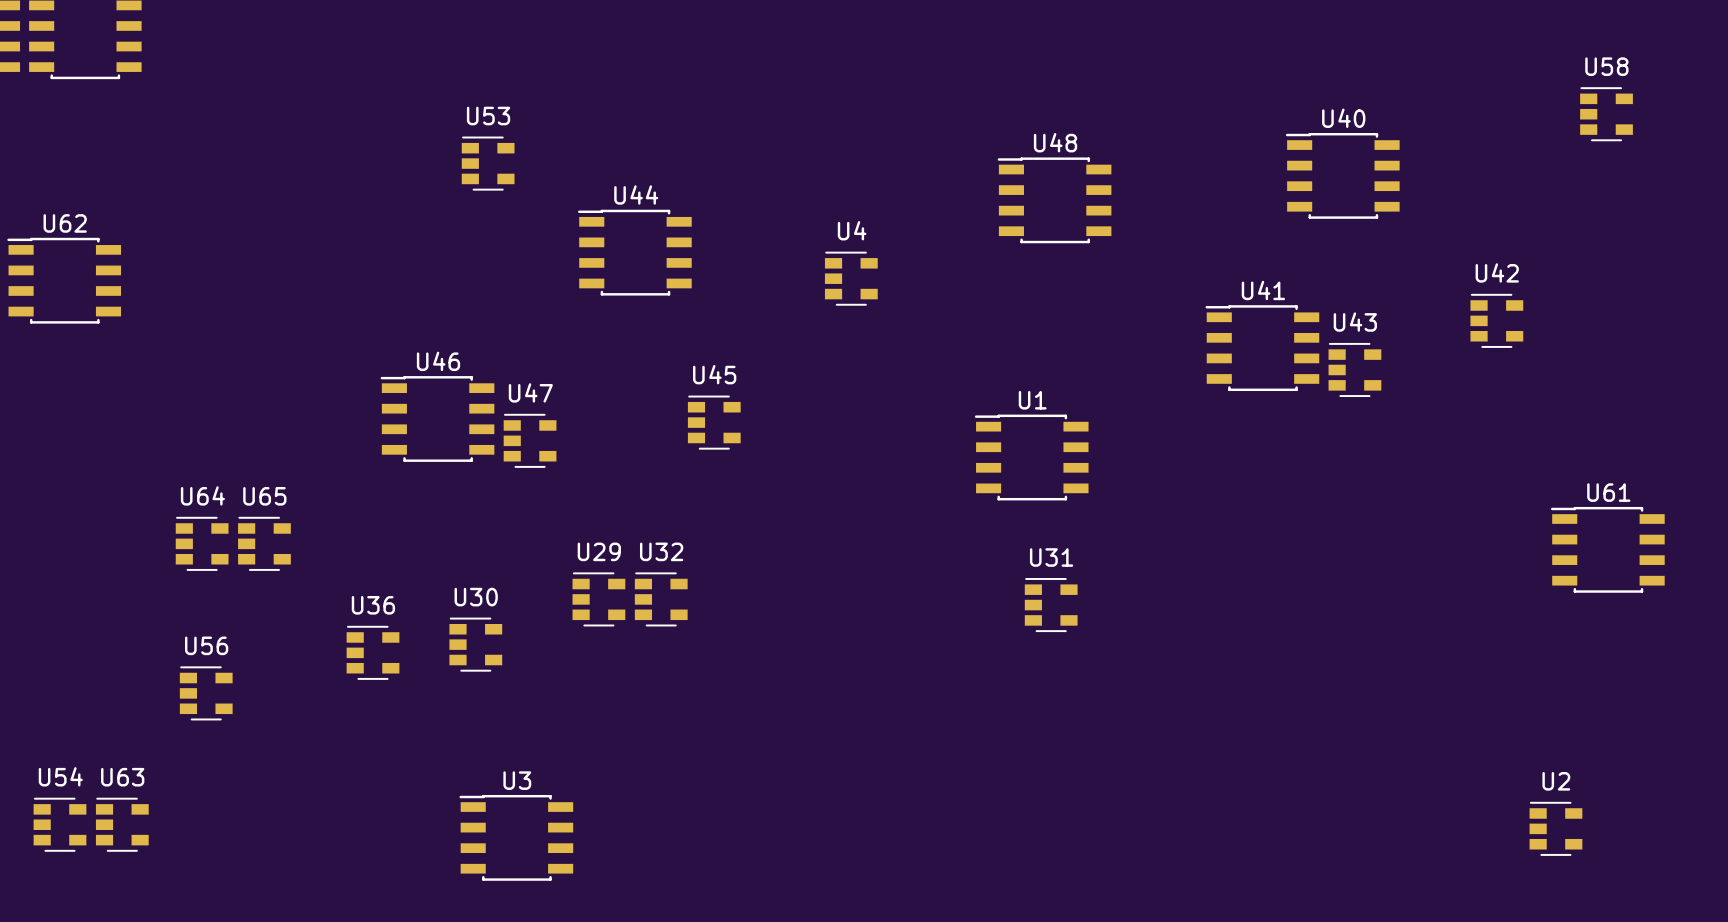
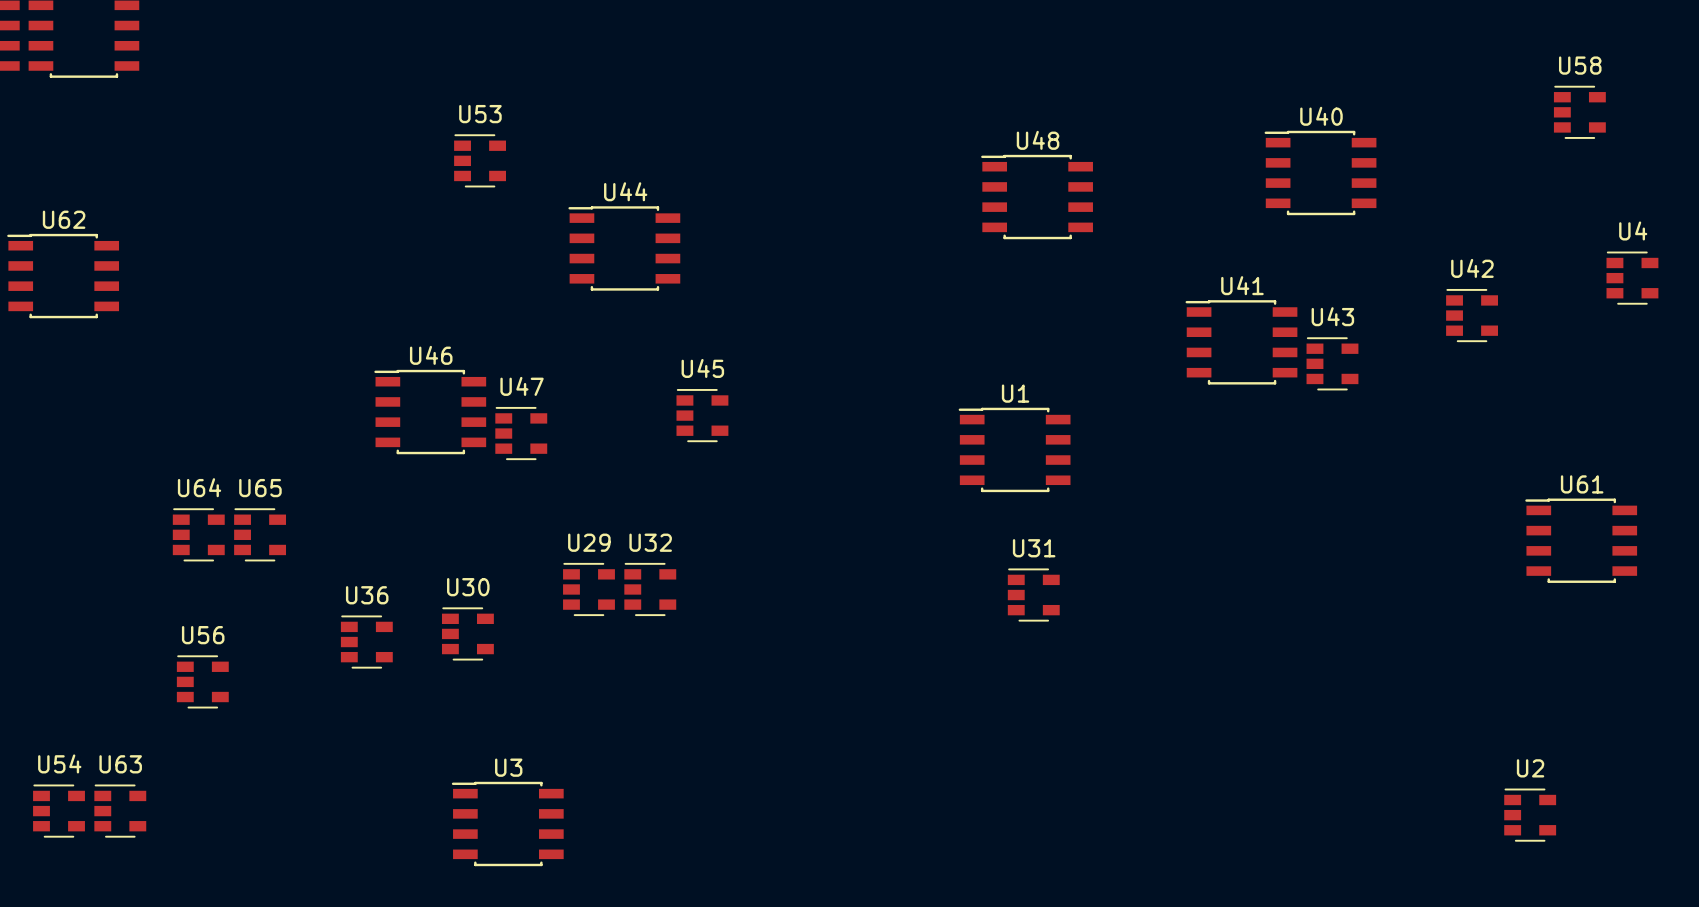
U4 position: (851, 278) -> (1632, 278)

